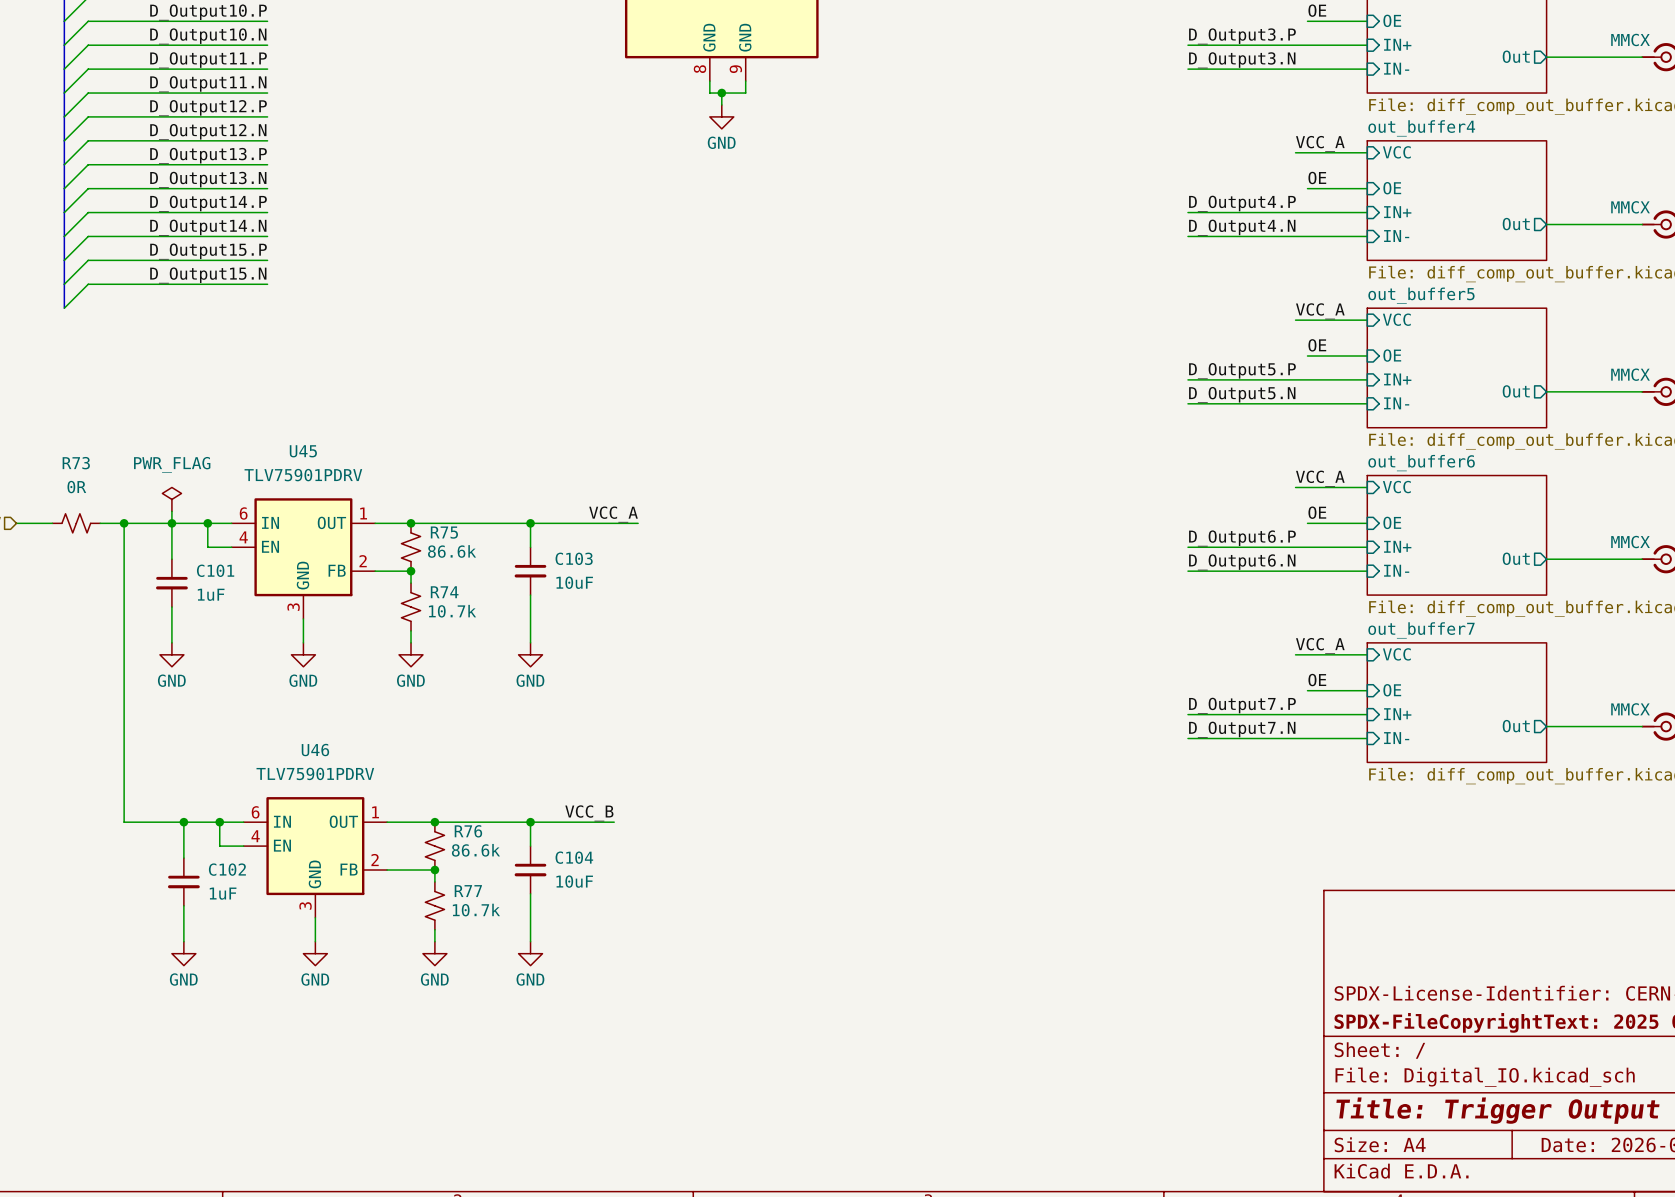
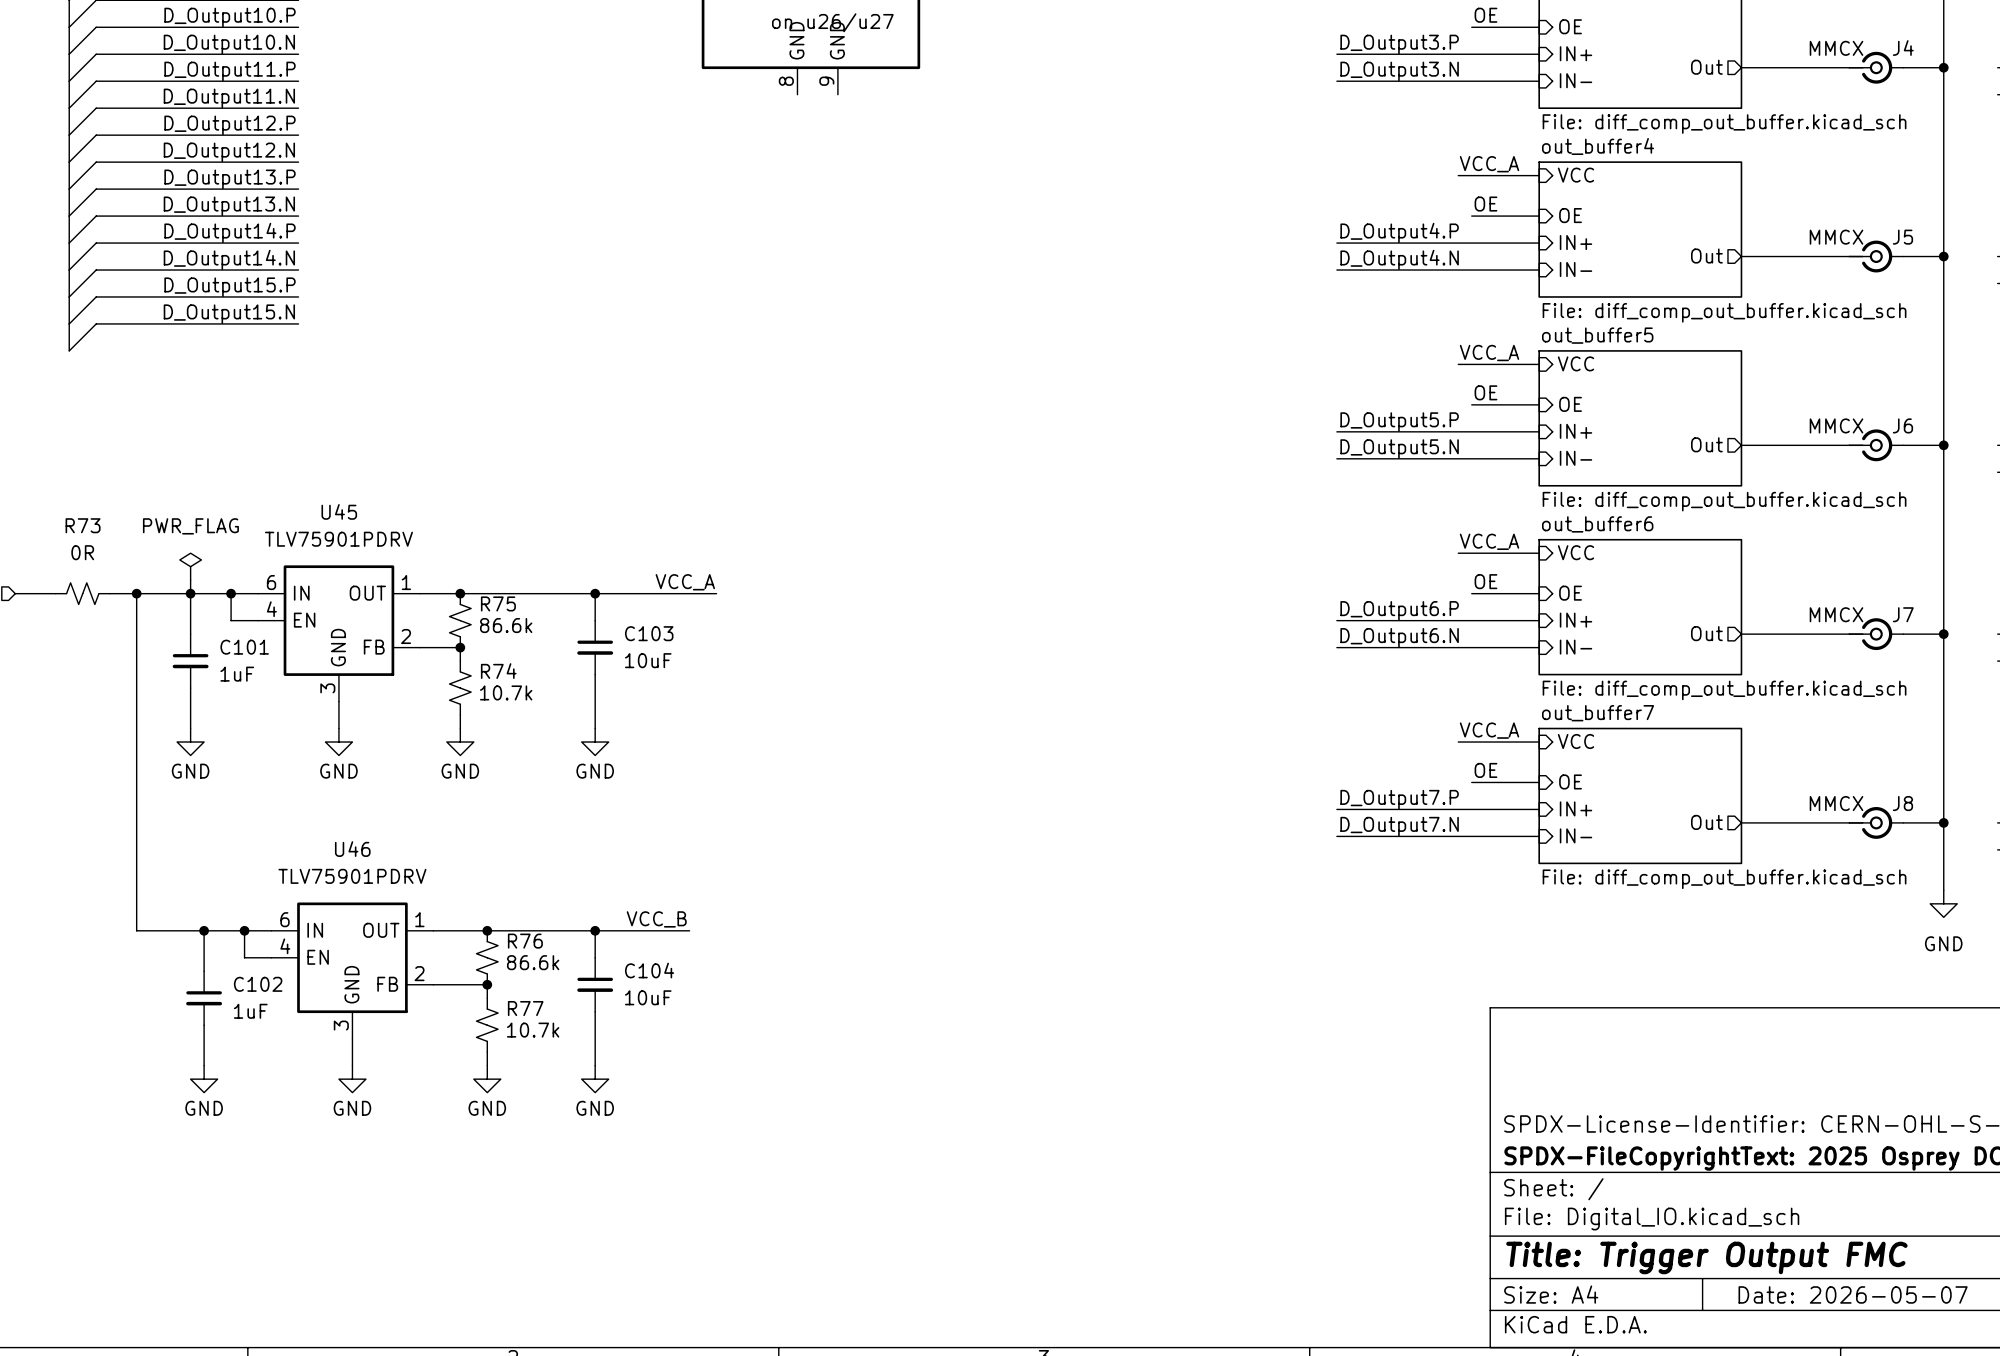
text: none -> on u26/u27 (832, 22)
wire: (709, 81) (709, 93) (745, 93) (745, 81) -> none
wire: (721, 93) (721, 104) -> none
junction: (721, 93) -> none
power symbol: GND (721, 116) -> none

